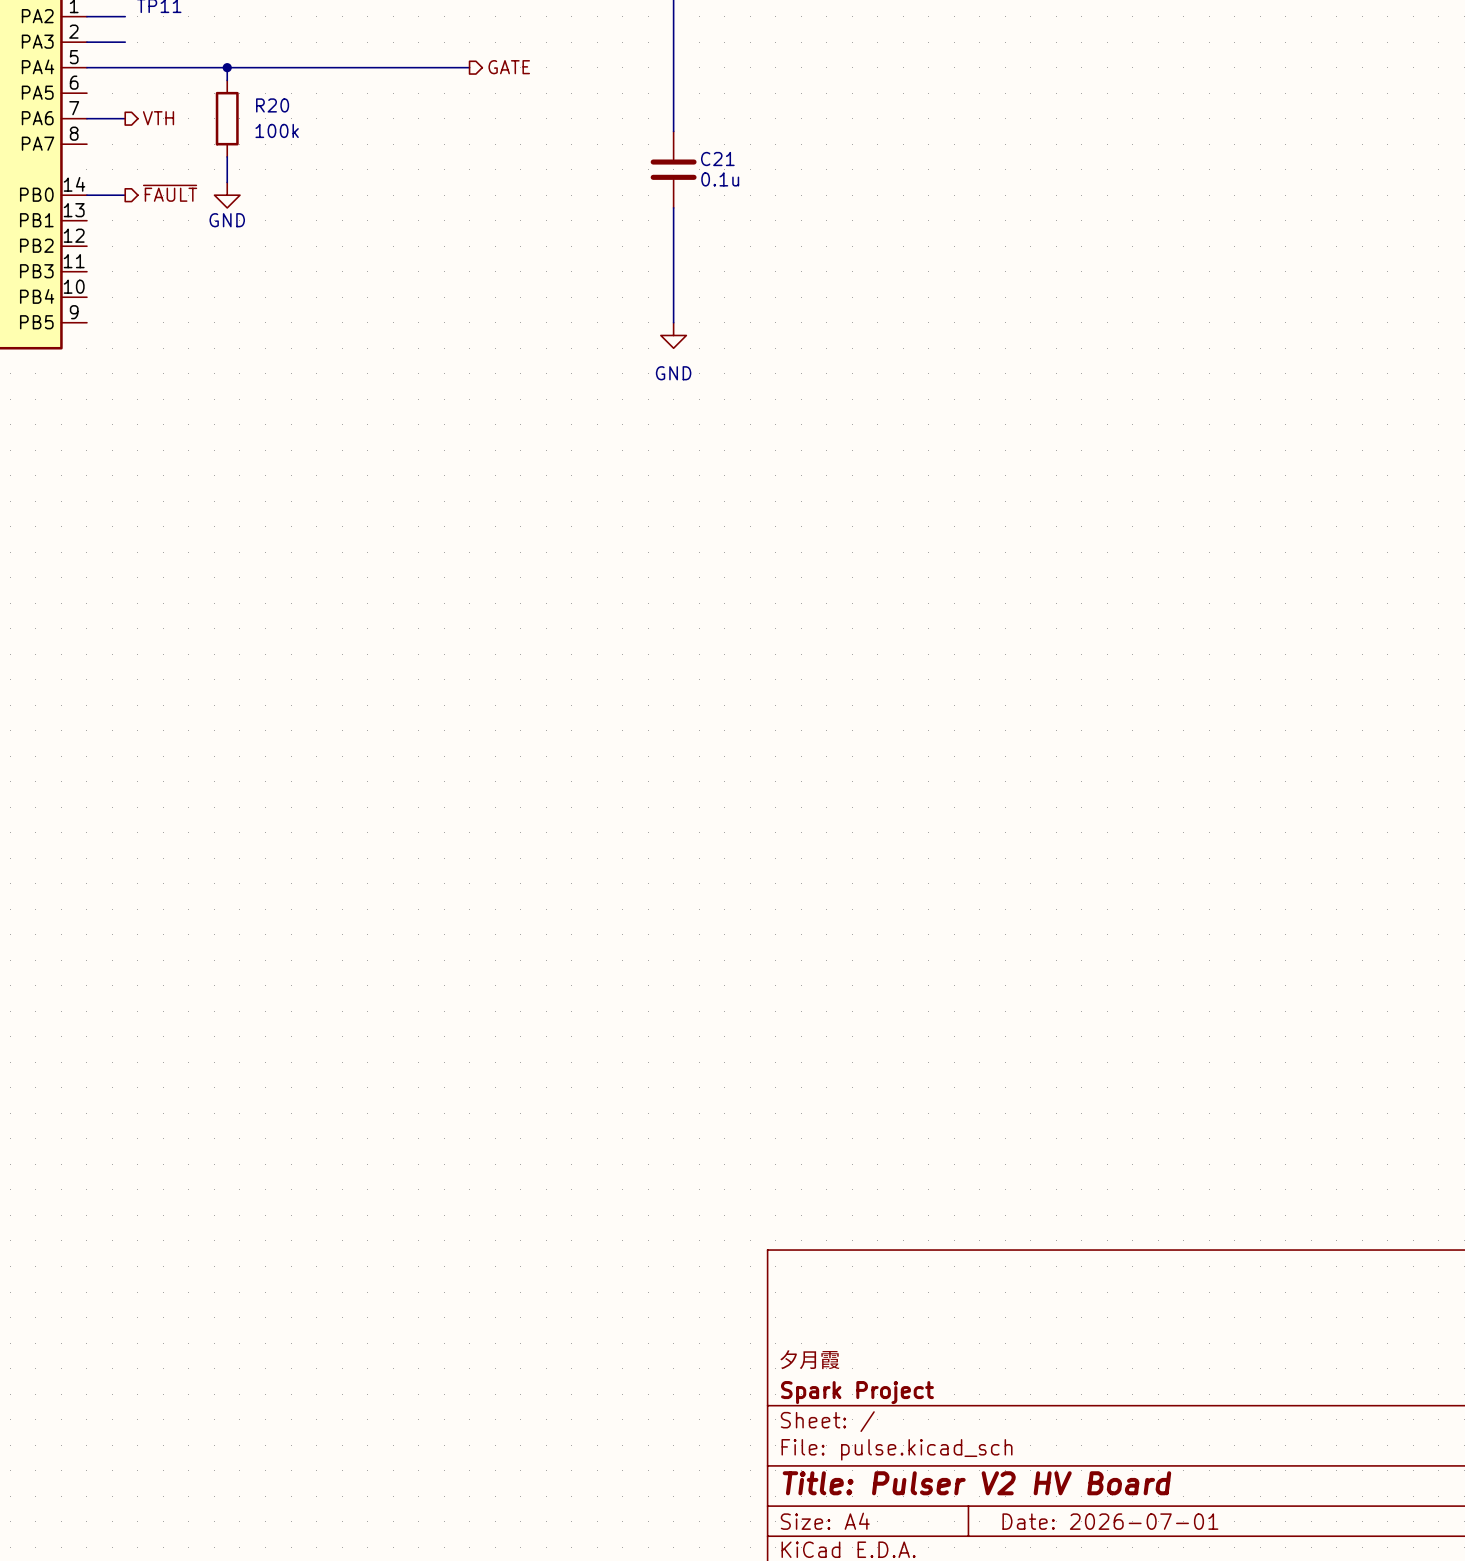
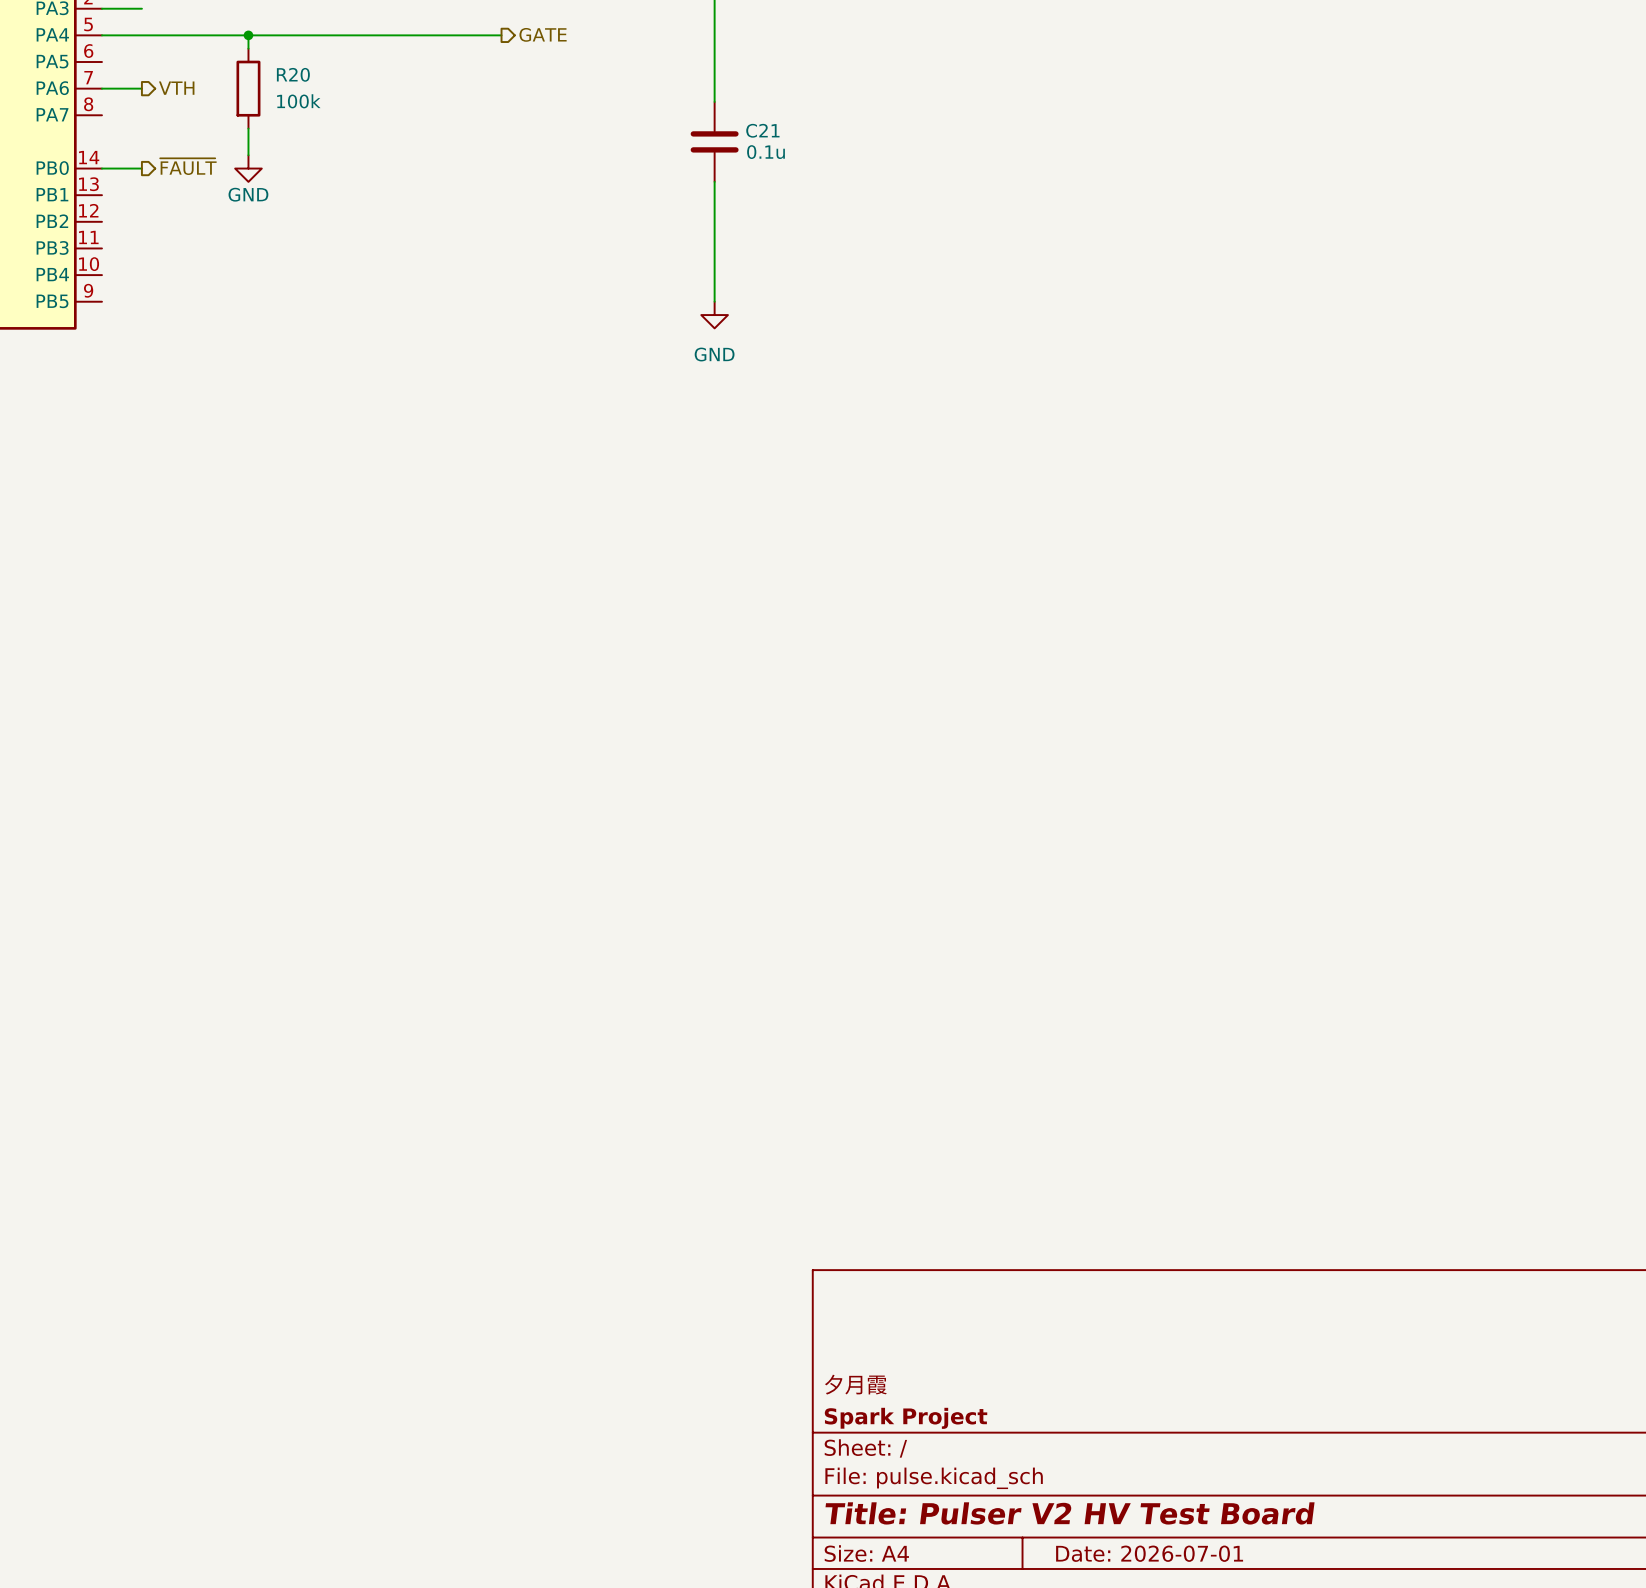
title block: Title: Pulser V2 HV Board (976, 1483) -> Title: Pulser V2 HV Test Board (1070, 1513)

